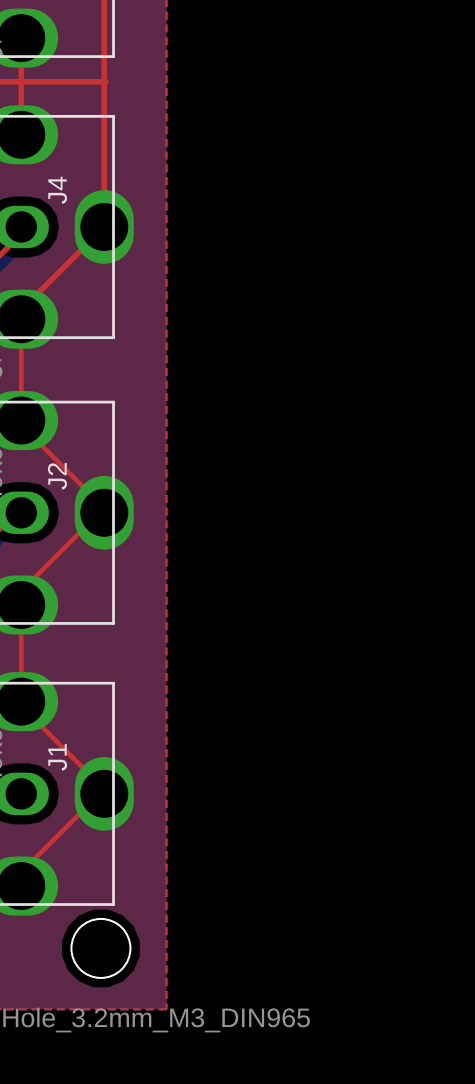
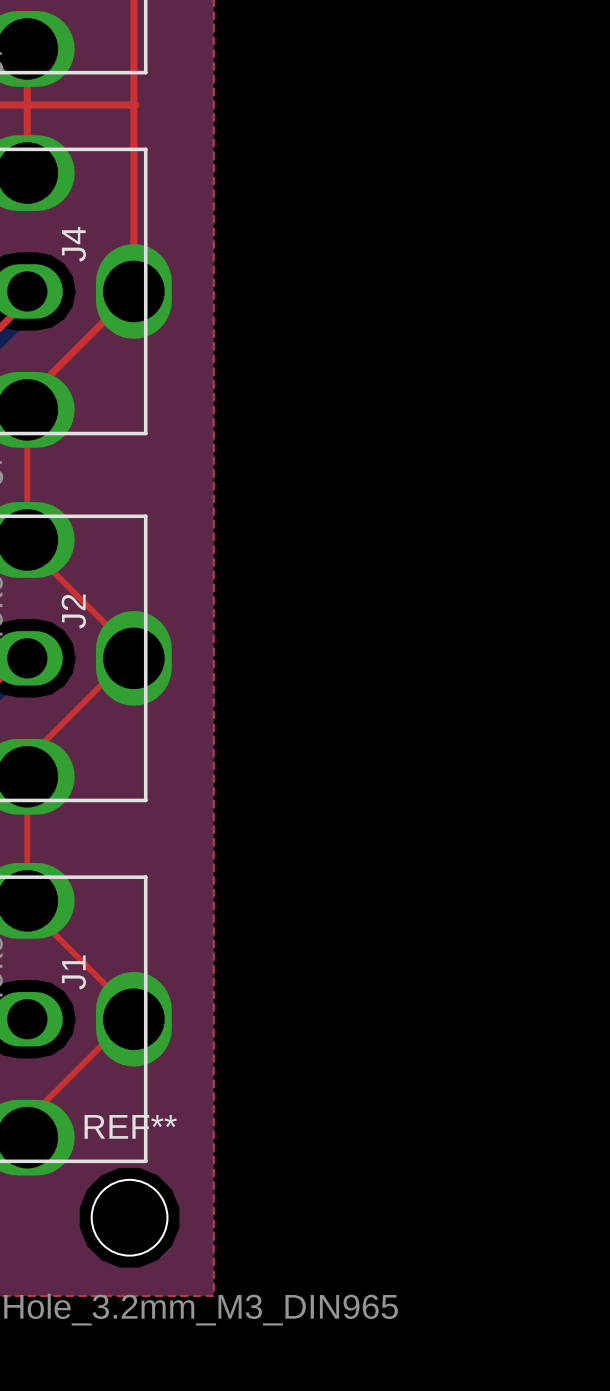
REF** name: none -> REF** (130, 1126)

